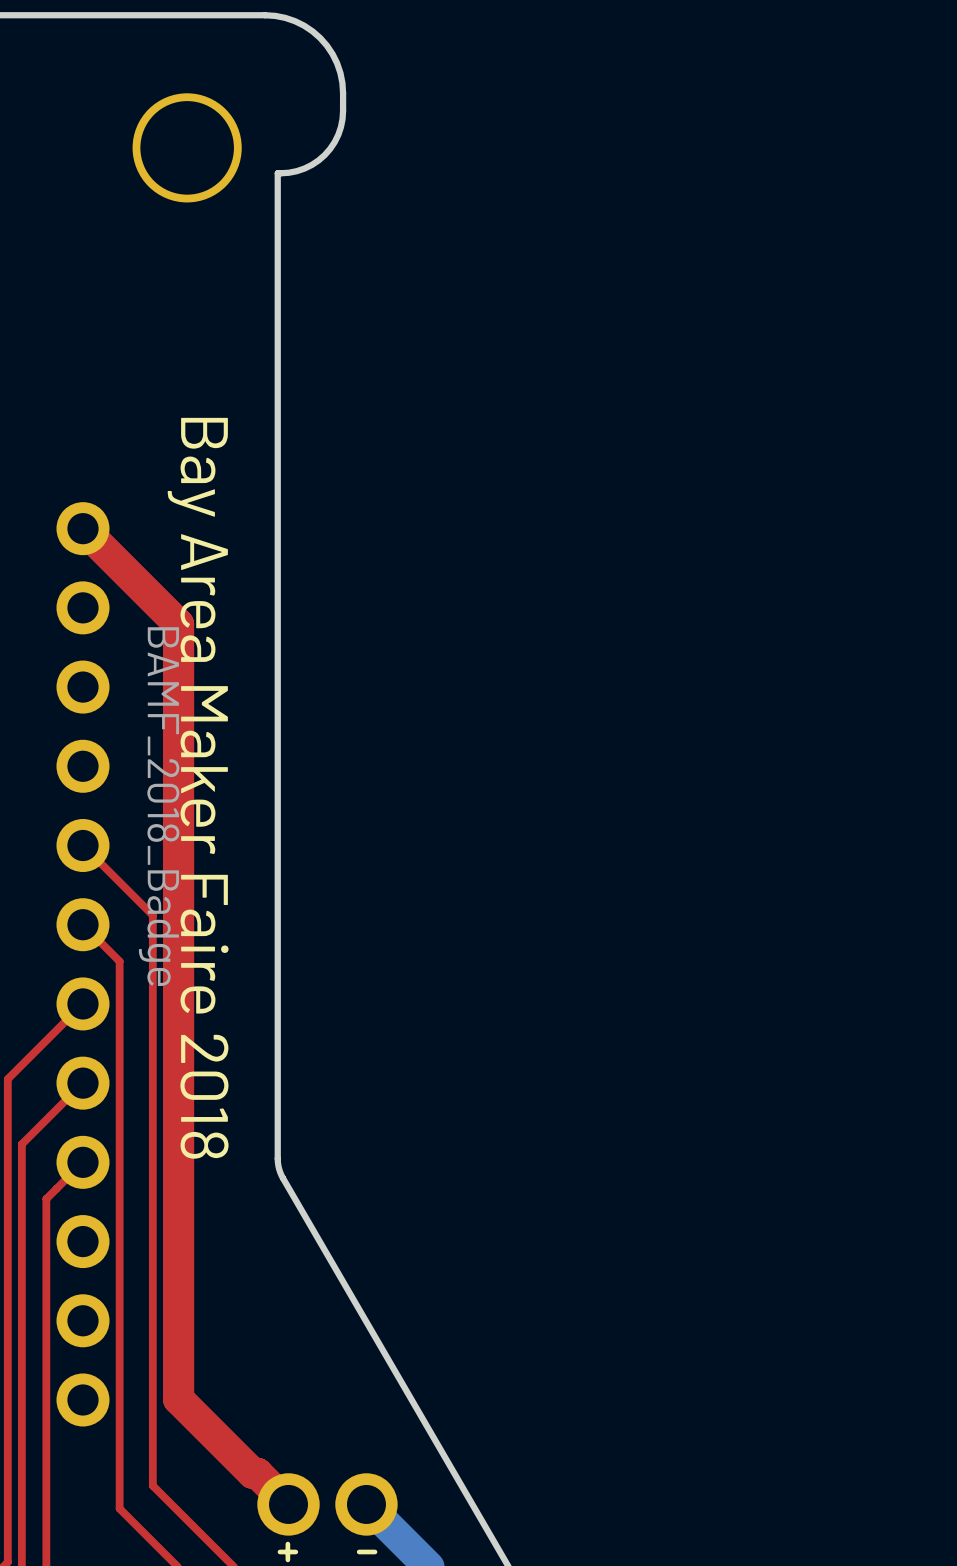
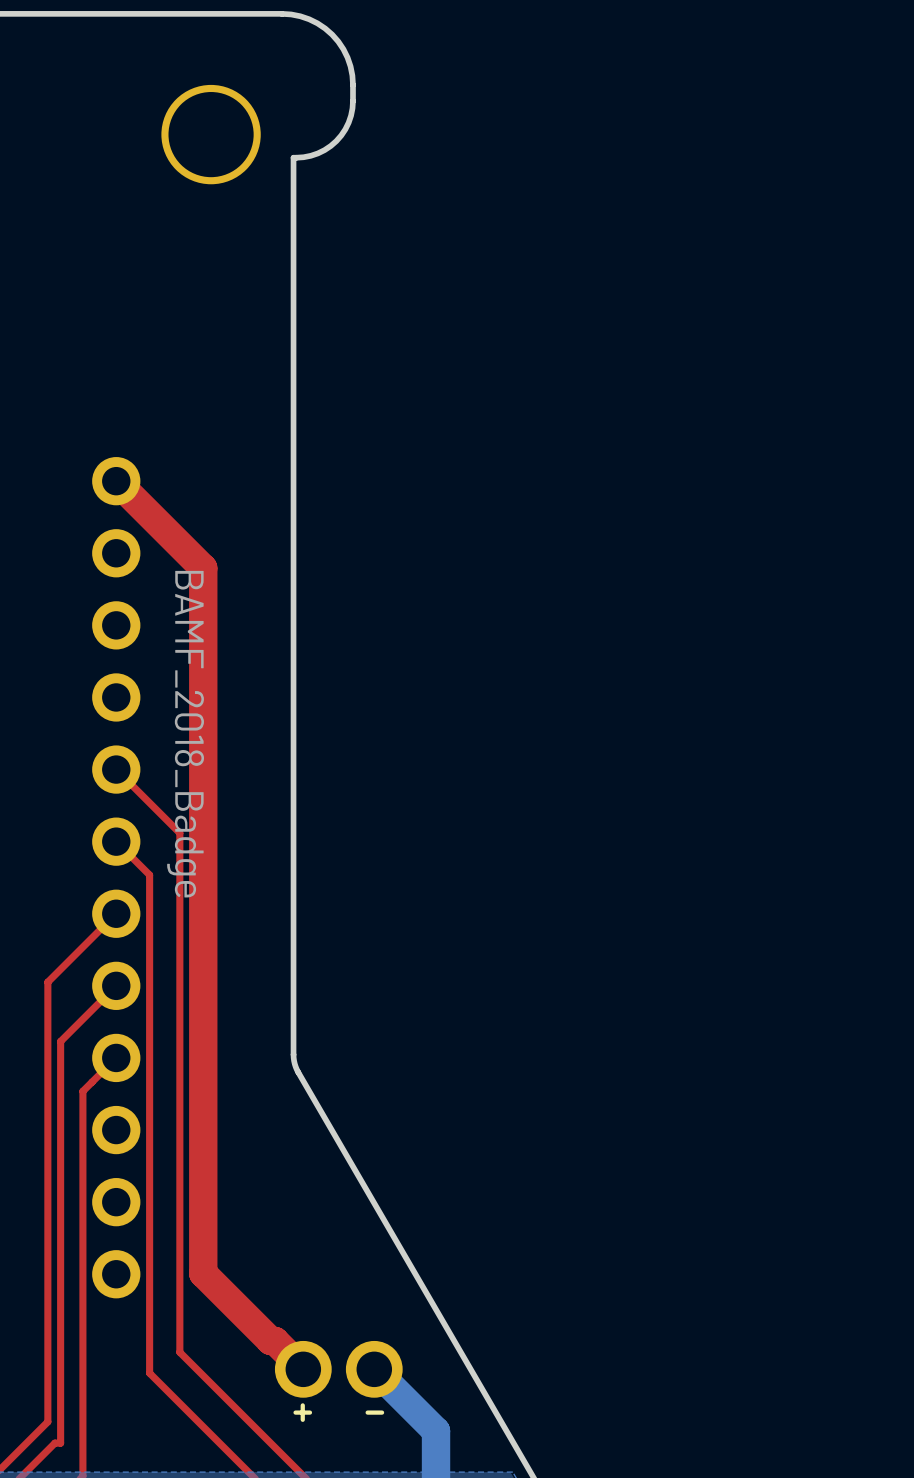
text: Bay Area Maker Faire 2018 (198, 788) -> none

